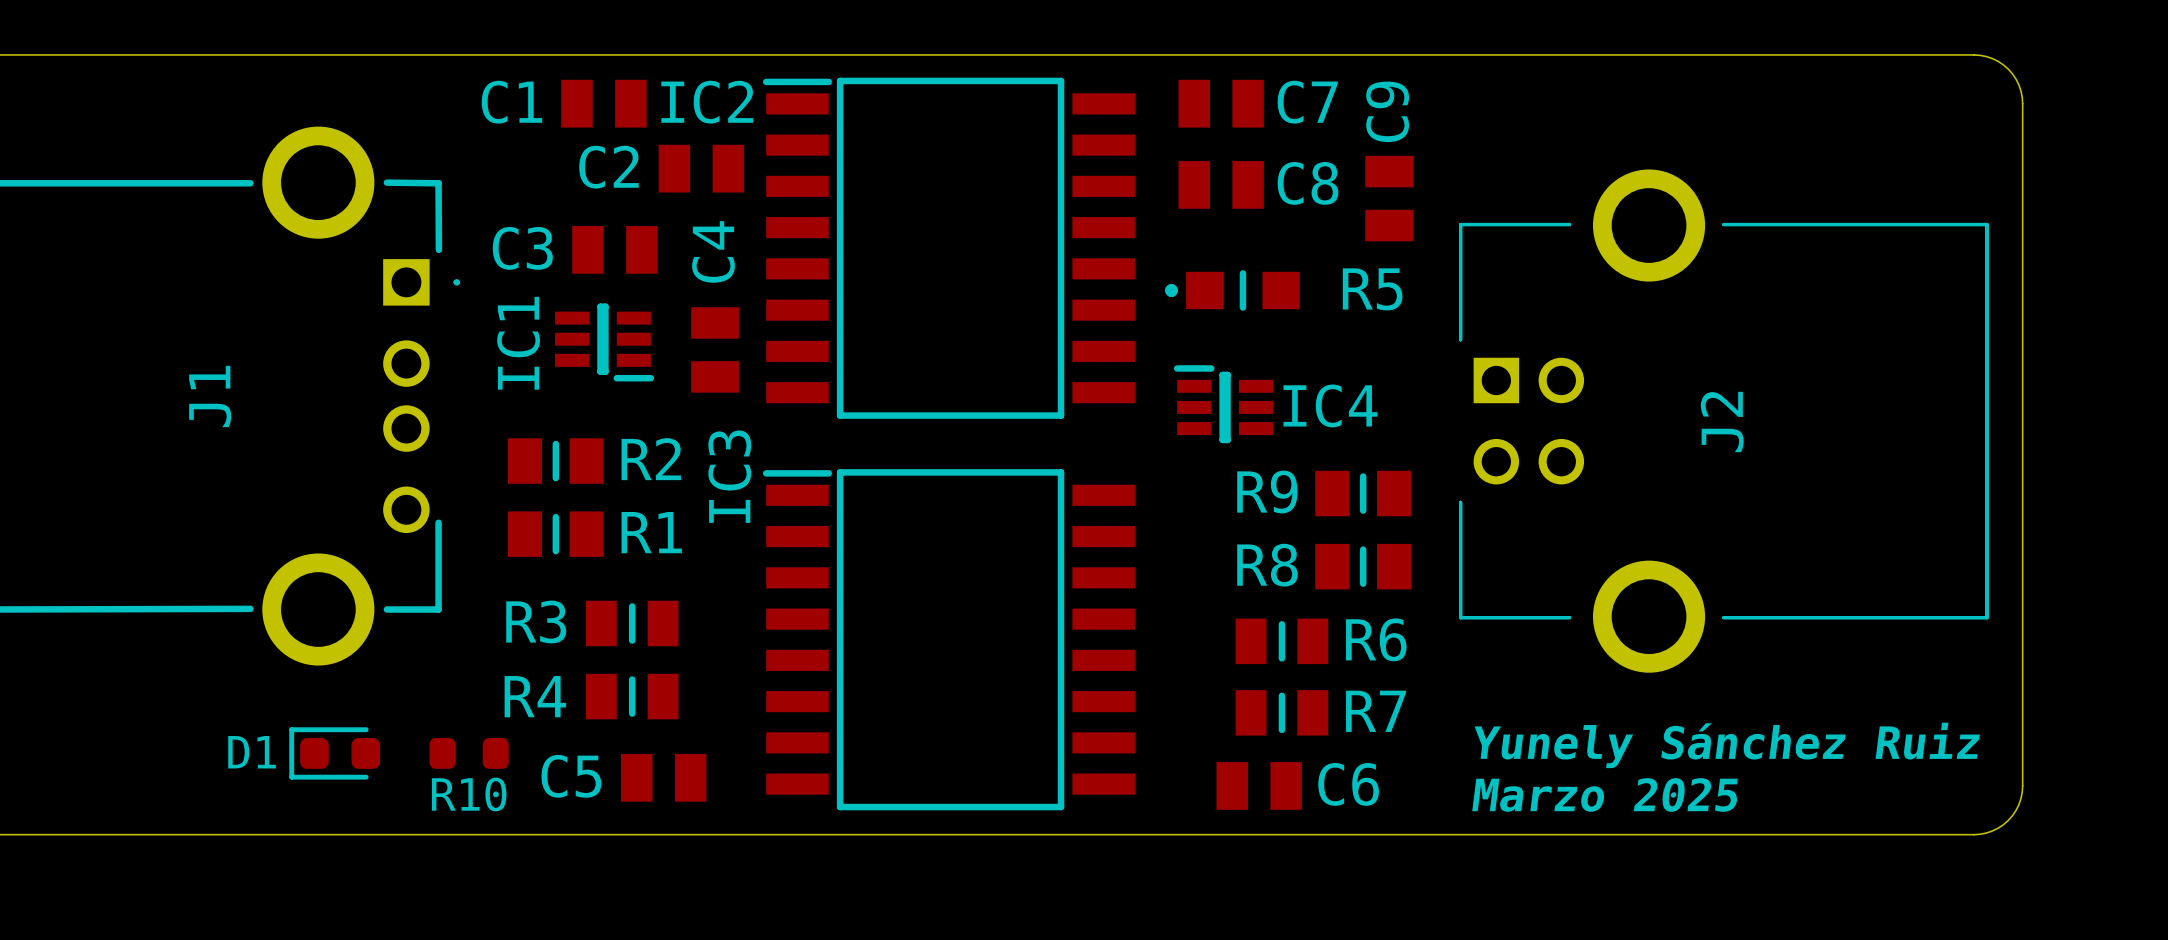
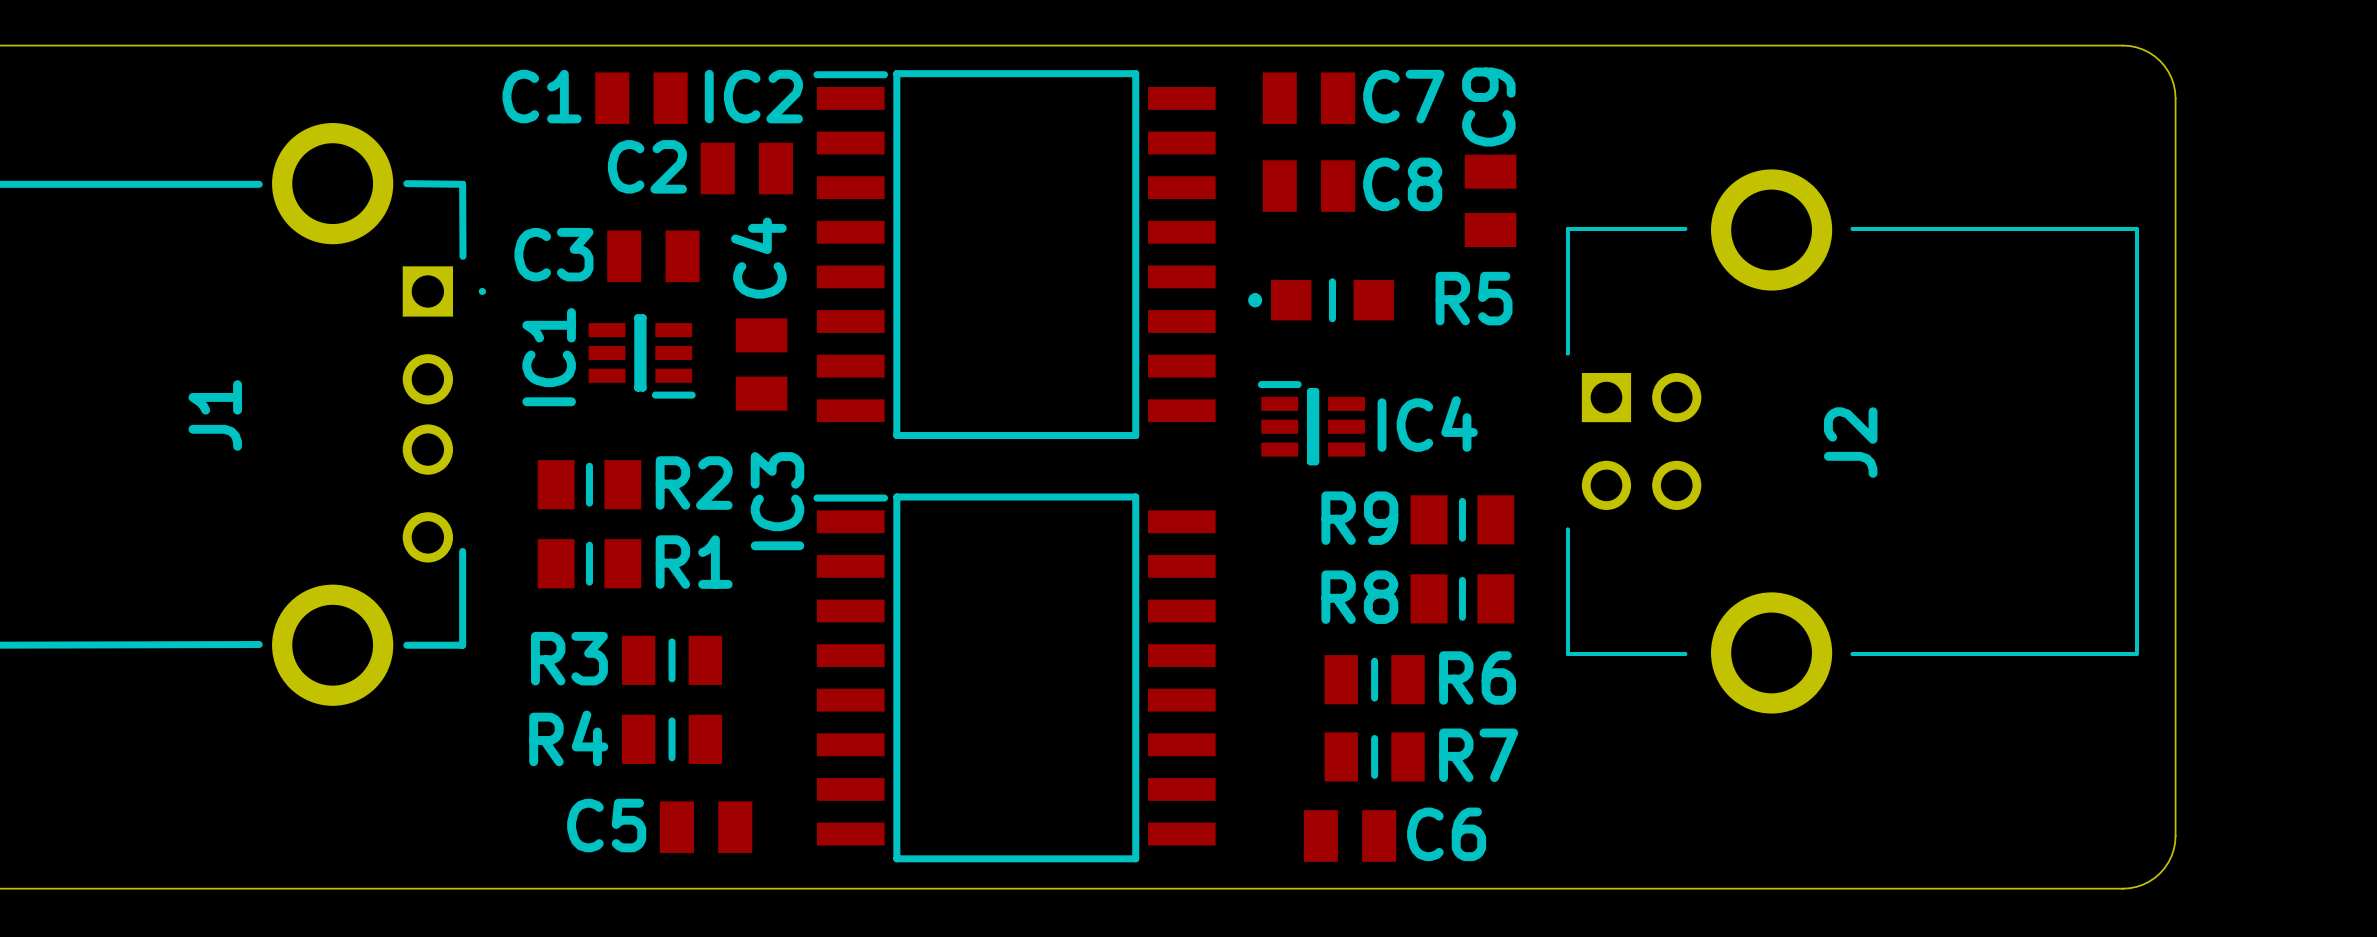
text: Yunely Sánchez Ruiz (1727, 745) -> none
D1: (334, 753) -> none
R10: (469, 753) -> none
text: Marzo 2025 (1604, 794) -> none

